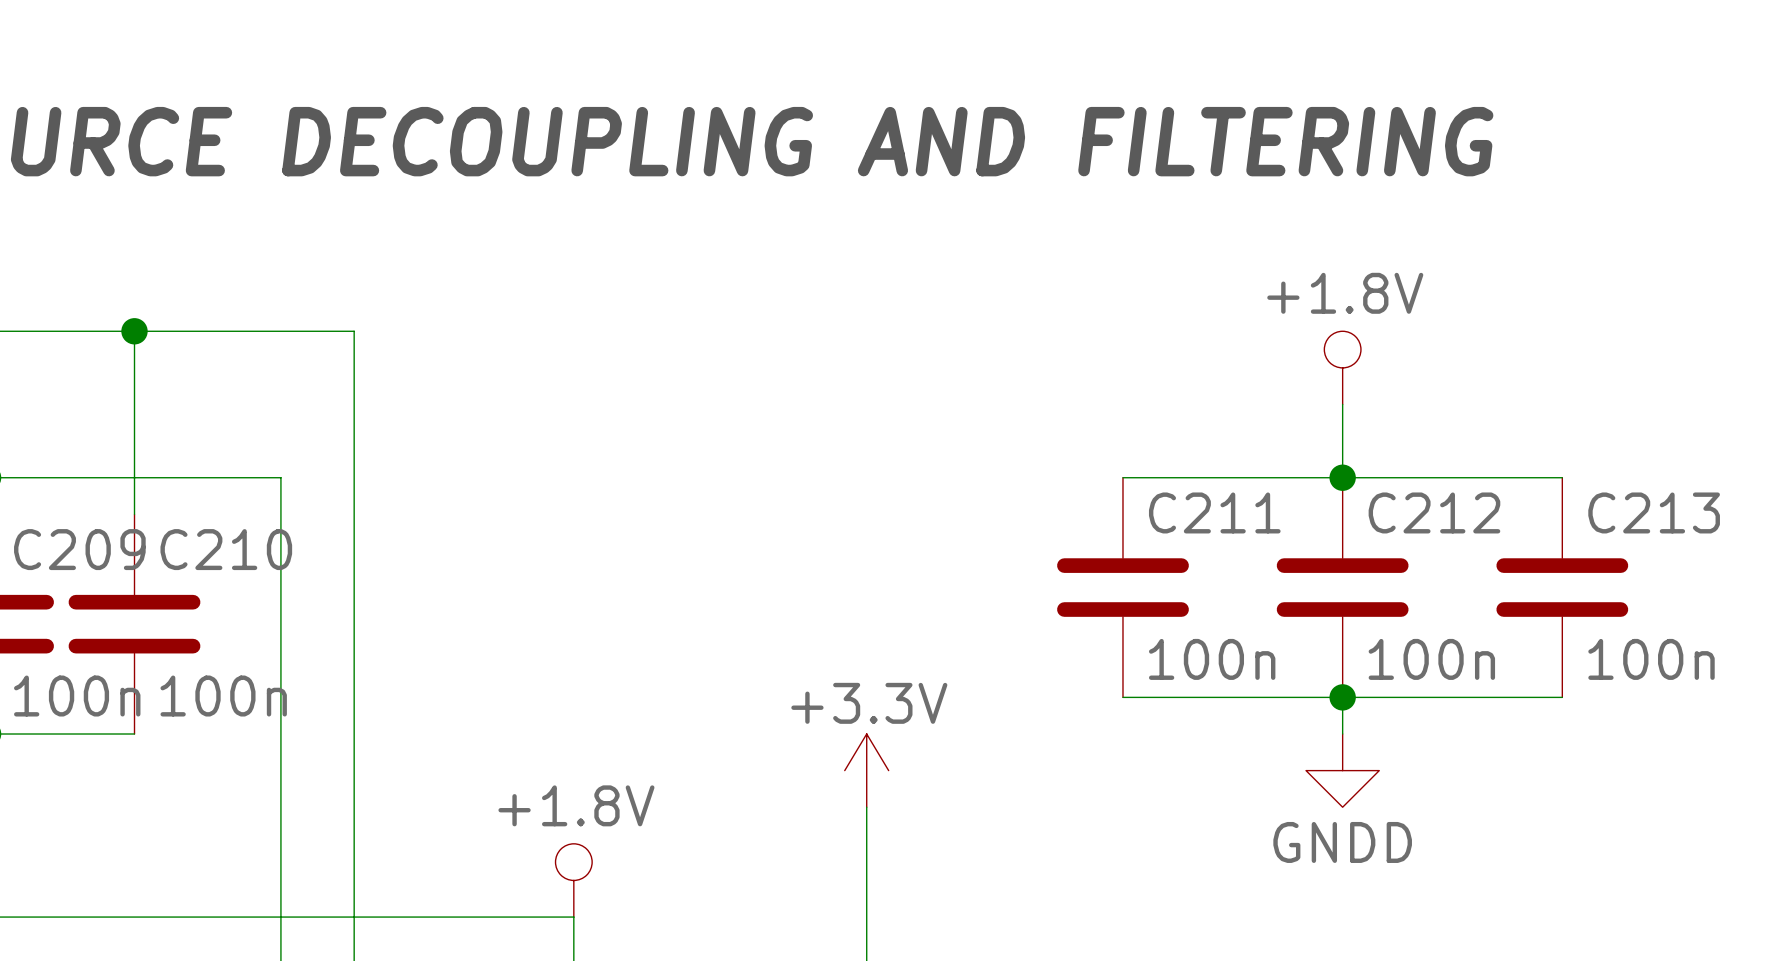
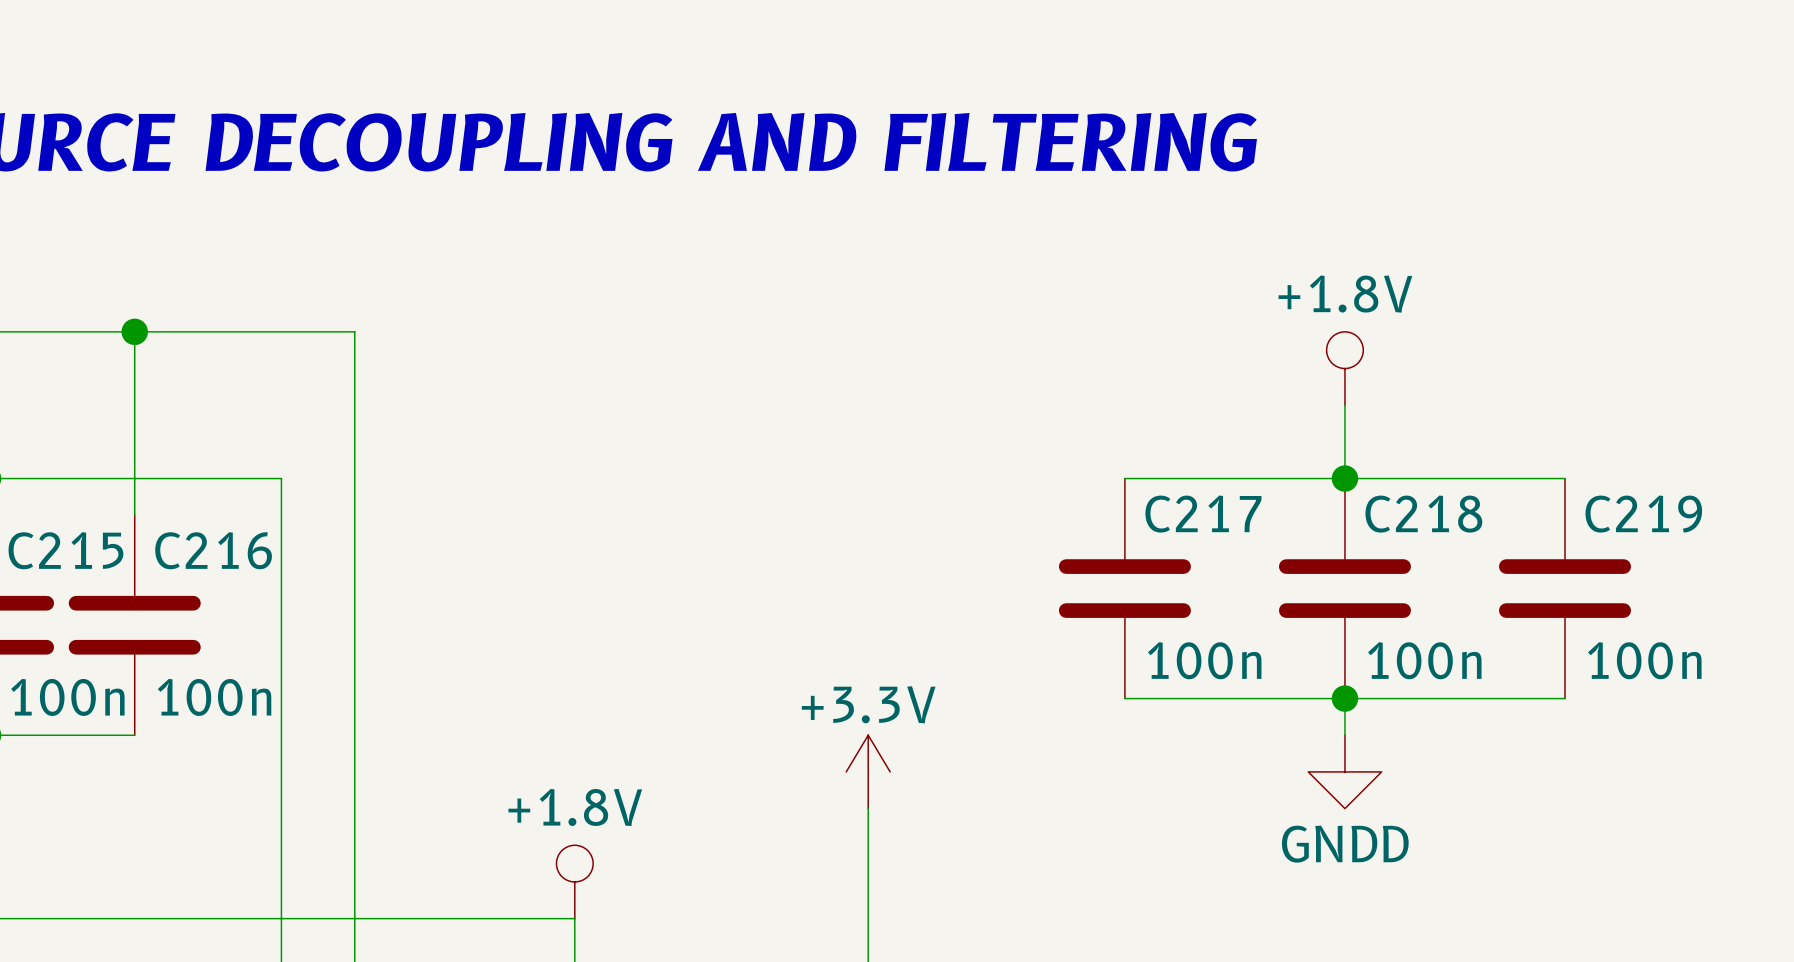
C211 name: C211 (1214, 512) -> C217 (1203, 514)
C212 name: C212 (1434, 512) -> C218 (1423, 514)
C213 name: C213 (1654, 512) -> C219 (1643, 514)
C209 name: C209 (79, 549) -> C215 (65, 550)
C210 name: C210 (226, 549) -> C216 (213, 550)

